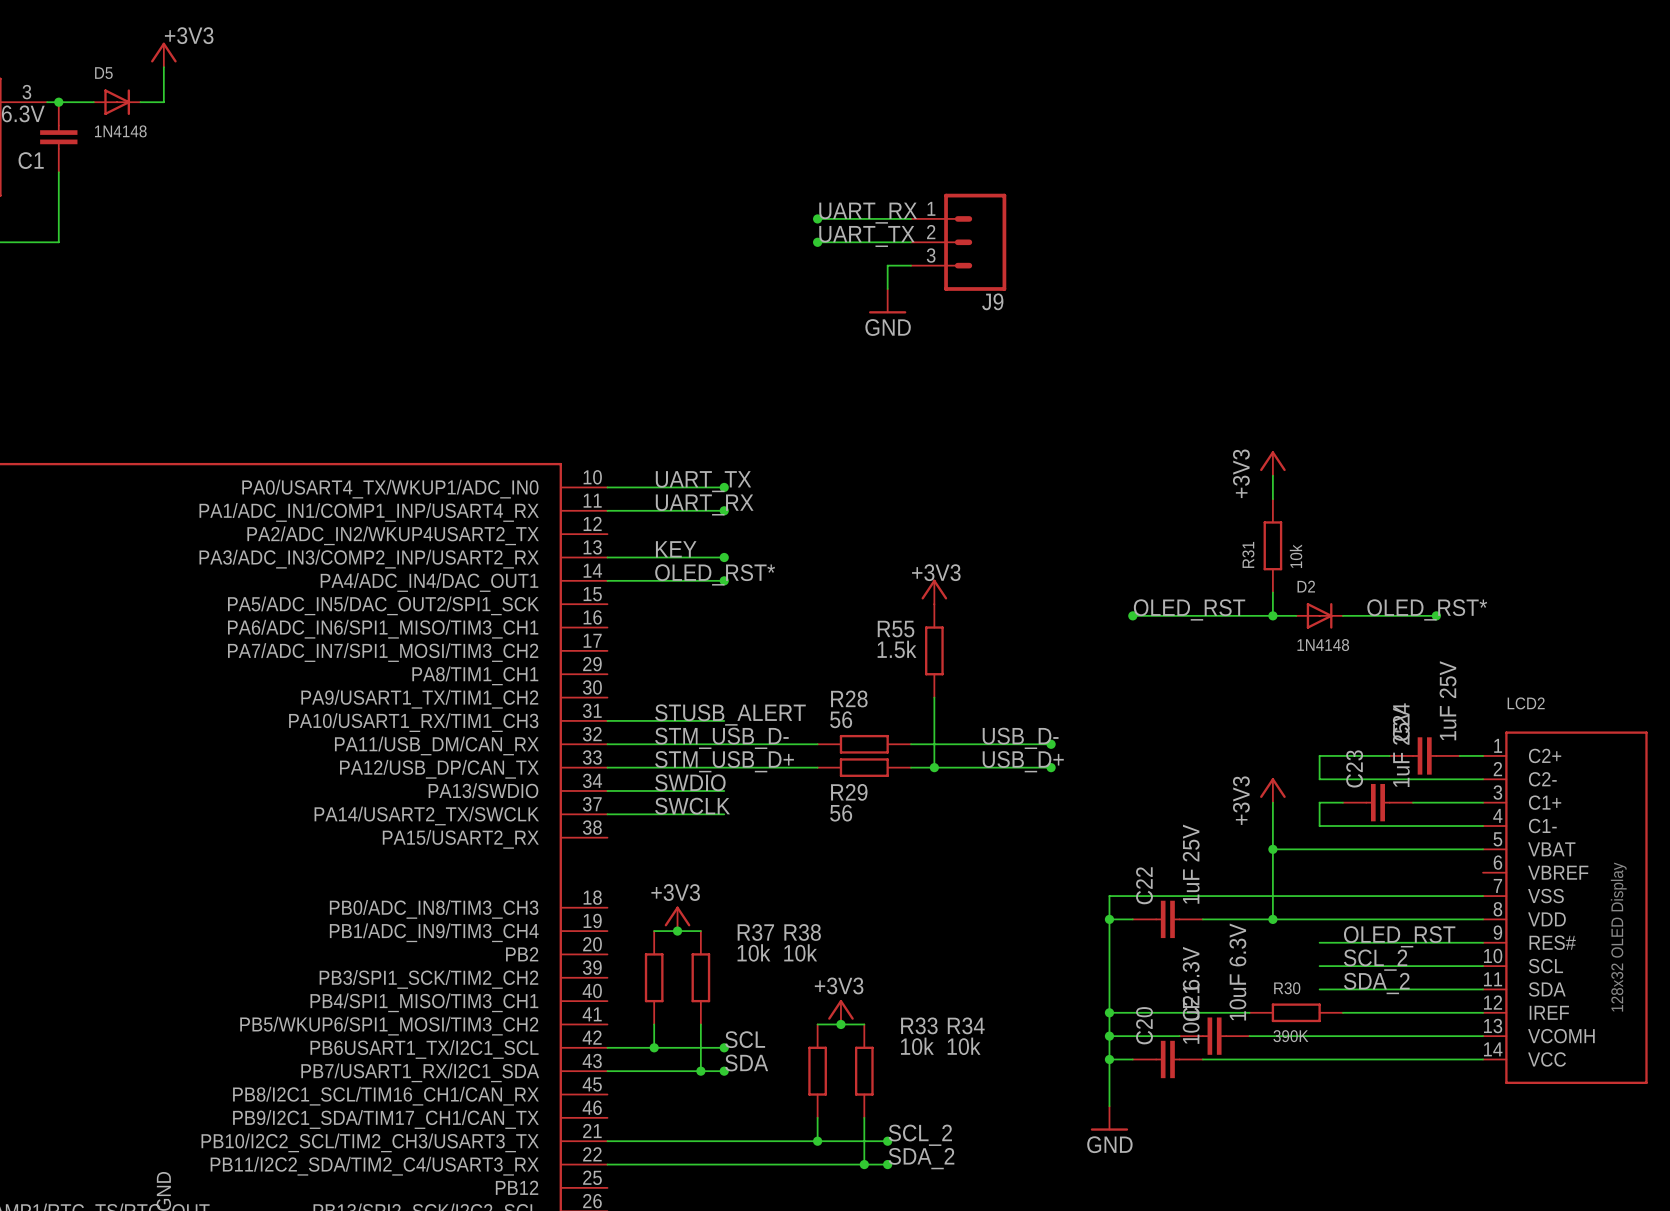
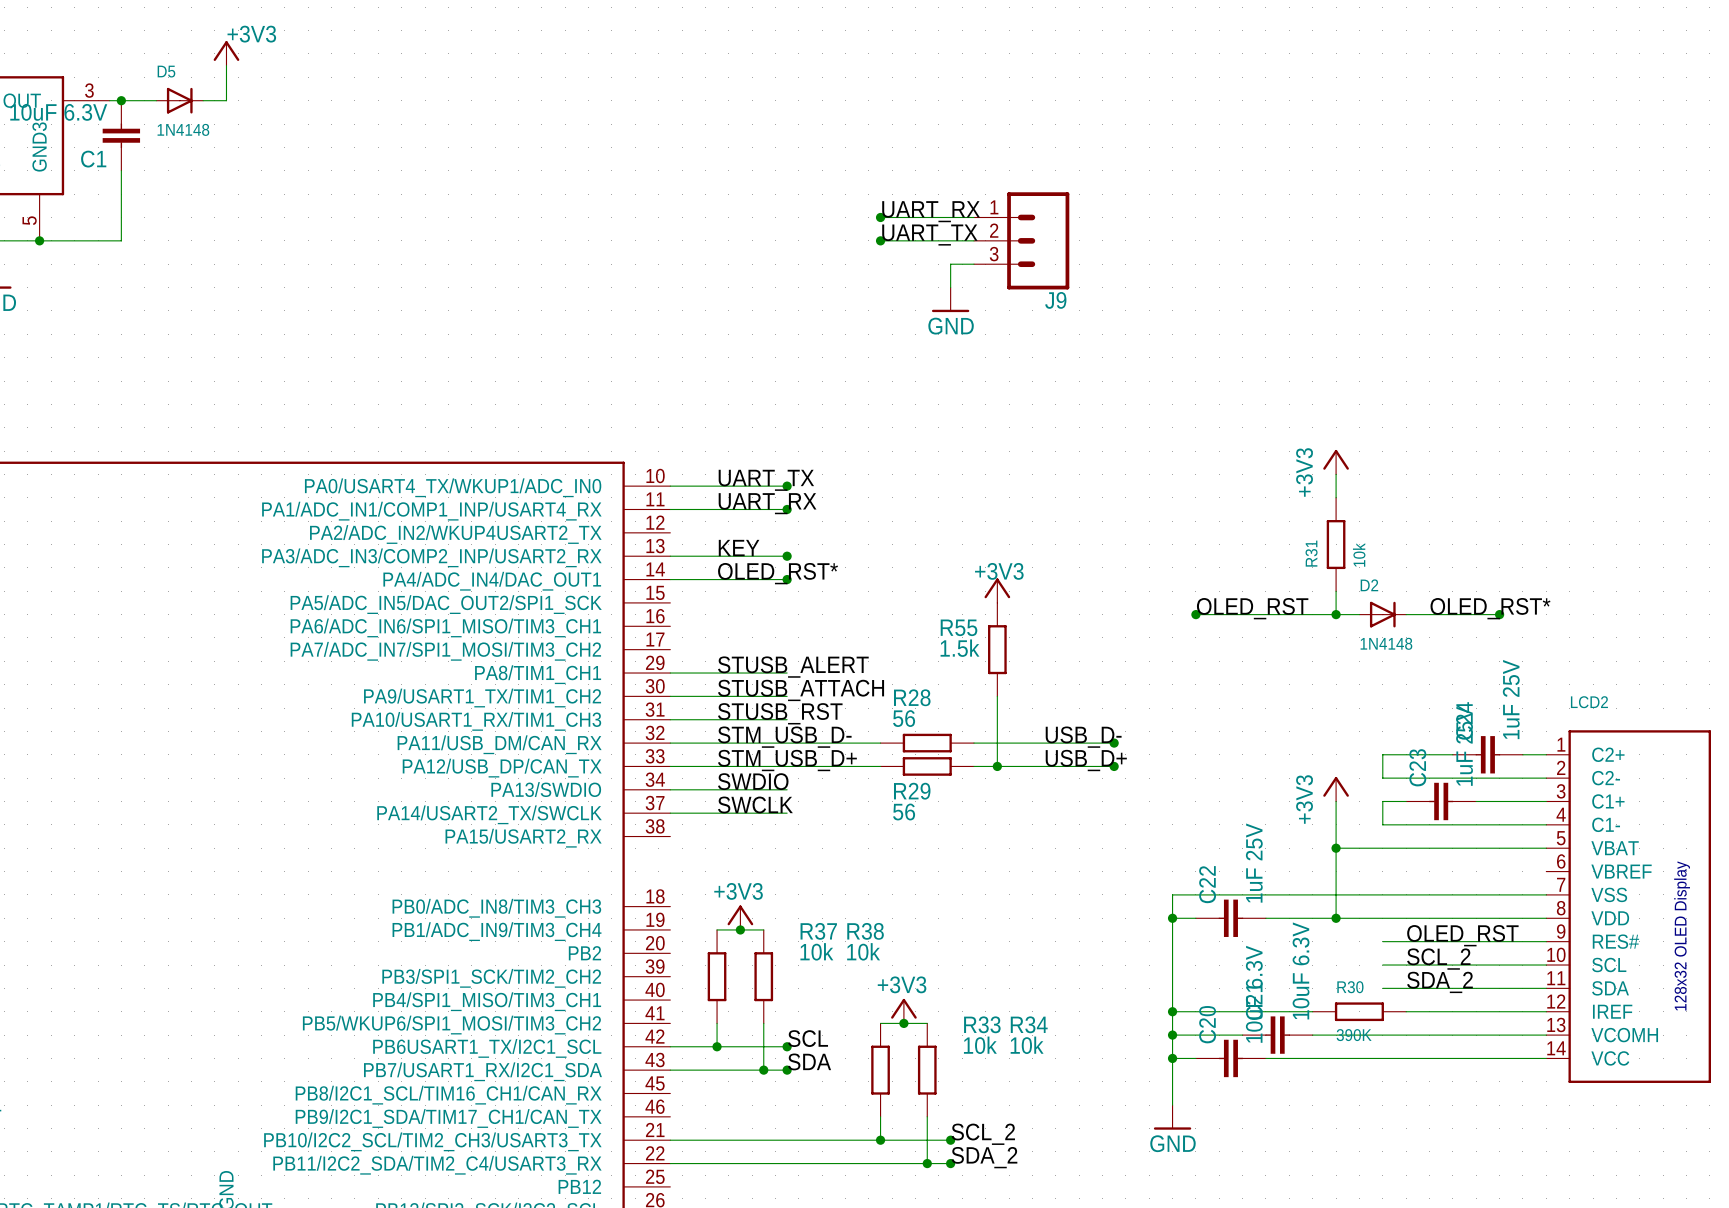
label: none -> STUSB_ALERT (793, 667)
wire: none -> (670, 673) (787, 673)
label: none -> STUSB_ATTACH (801, 690)
wire: none -> (670, 696) (787, 696)
label: STUSB_ALERT (730, 715) -> STUSB_RST (780, 713)

